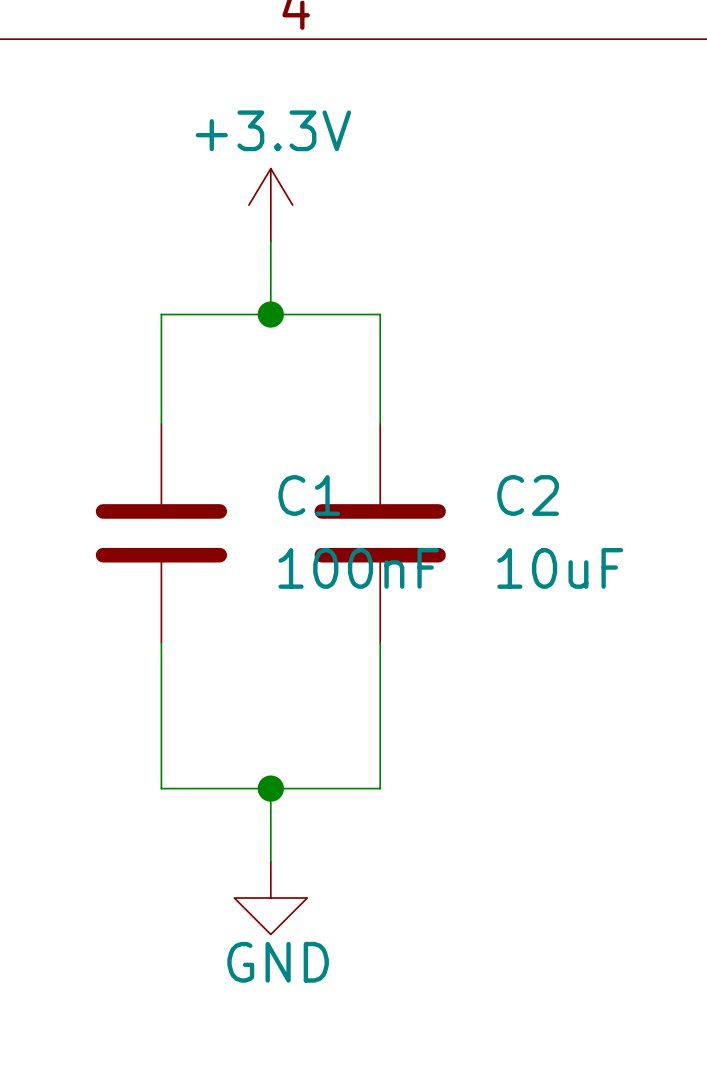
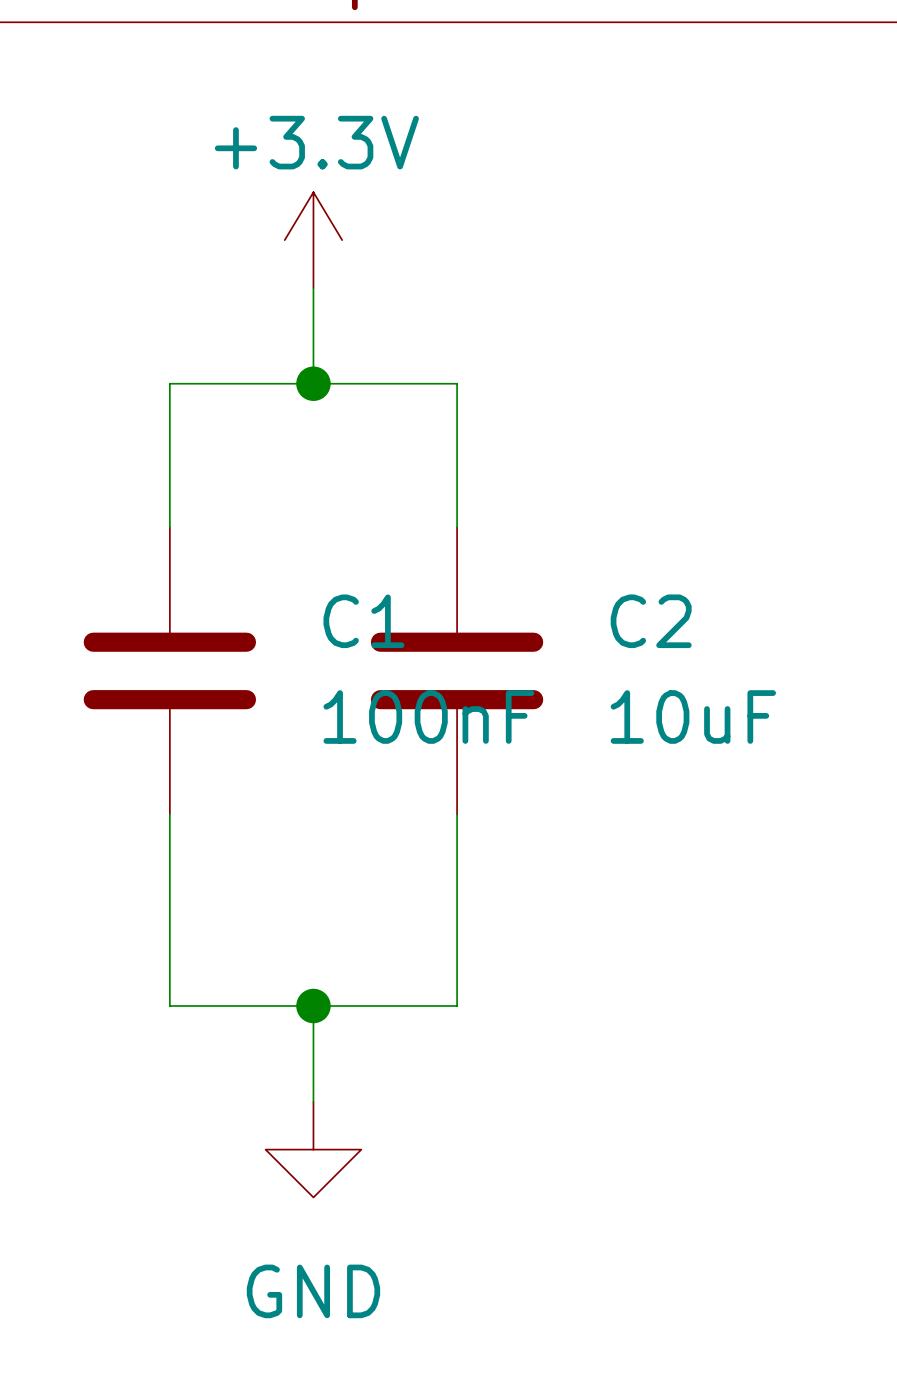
power symbol text position: GND (278, 962) -> GND (313, 1291)

